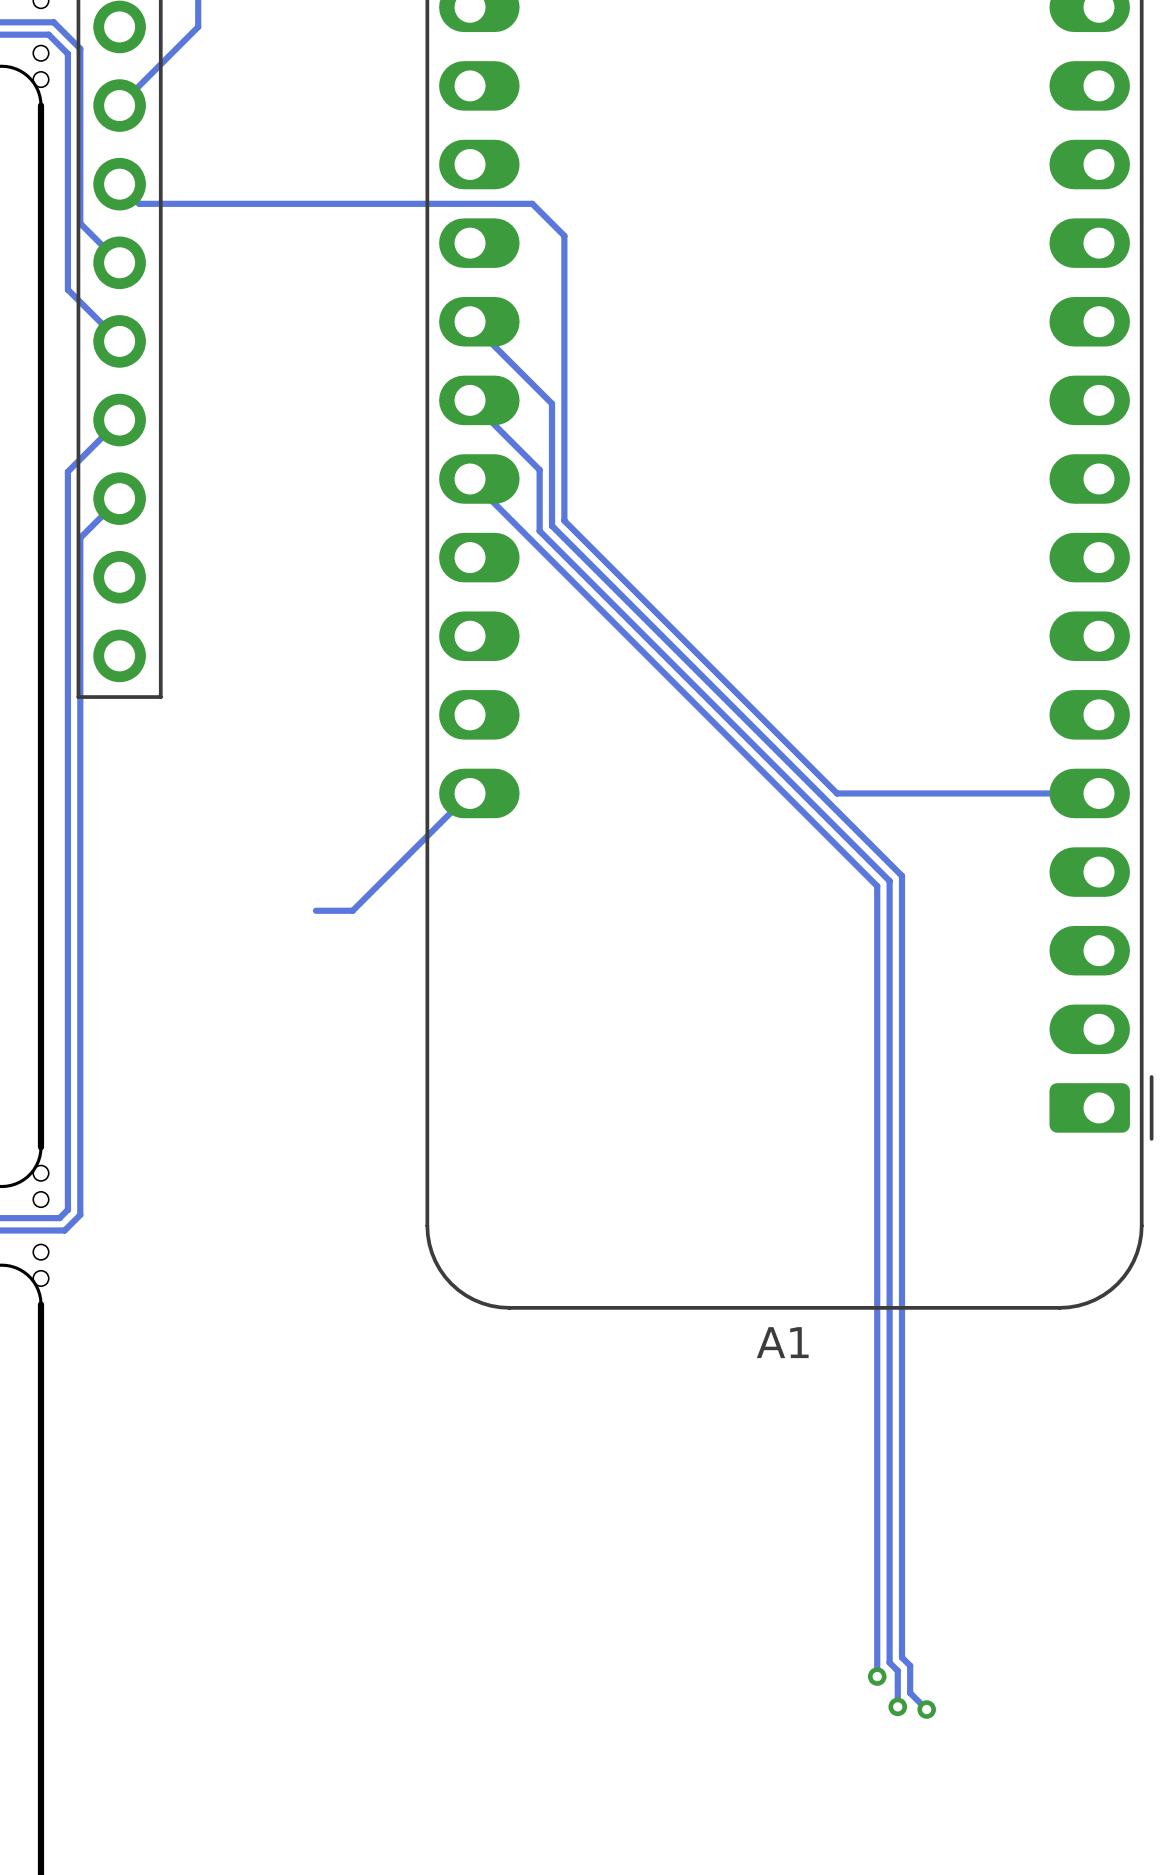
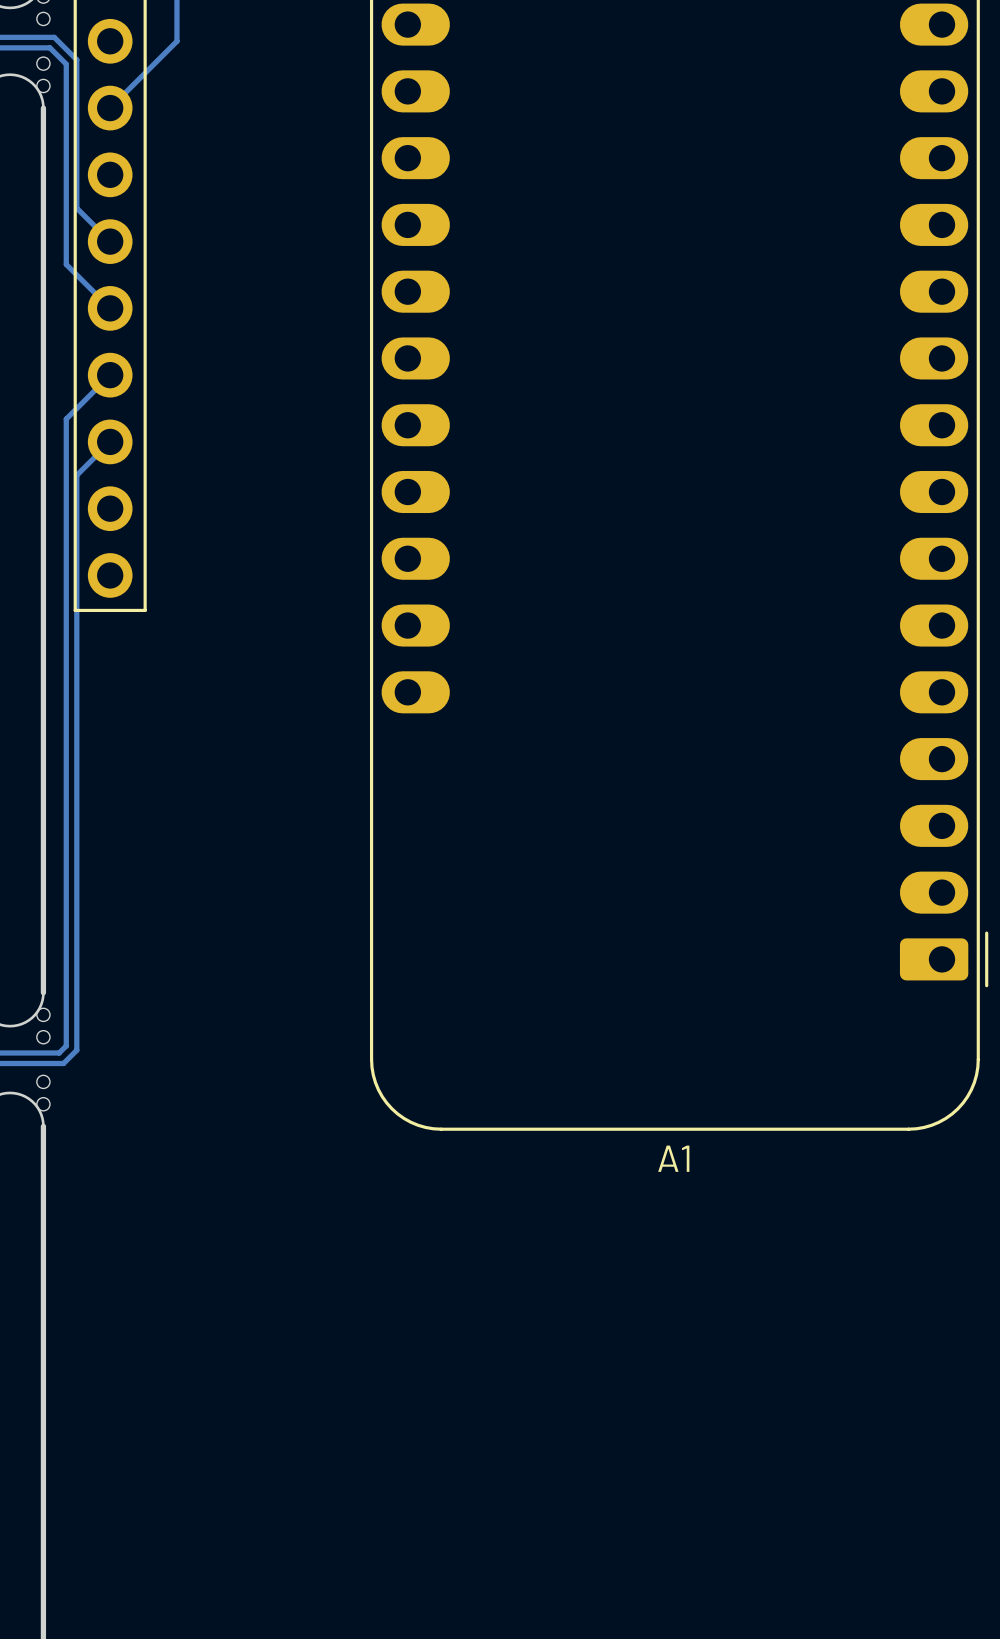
track: (119, 184) (139, 203) (532, 203) (564, 235) (564, 520) (837, 793) (1098, 793) -> none
track: (470, 321) (552, 403) (552, 525) (901, 875) (901, 1657) (910, 1665) (910, 1692) (926, 1709) -> none
track: (470, 400) (539, 469) (539, 531) (889, 881) (889, 1662) (897, 1670) (897, 1706) -> none
track: (470, 478) (877, 886) (877, 1676) -> none
track: (470, 793) (352, 910) (315, 910) -> none
via: (877, 1676) -> none
via: (897, 1706) -> none
via: (926, 1709) -> none

